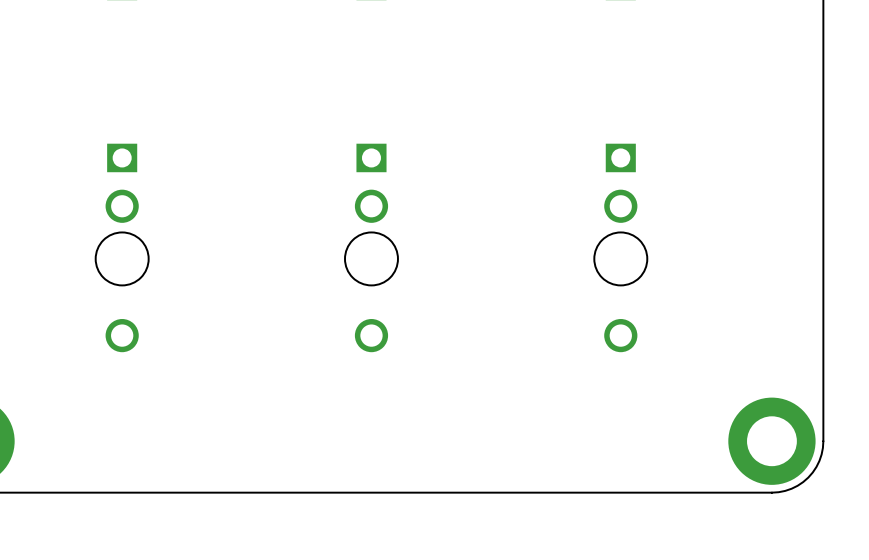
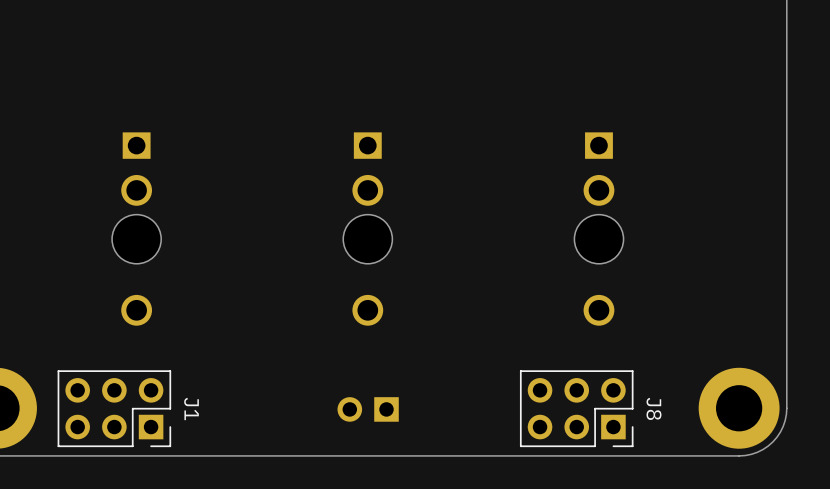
J1: none -> (114, 408)
J8: none -> (576, 408)
part: none -> (368, 409)

